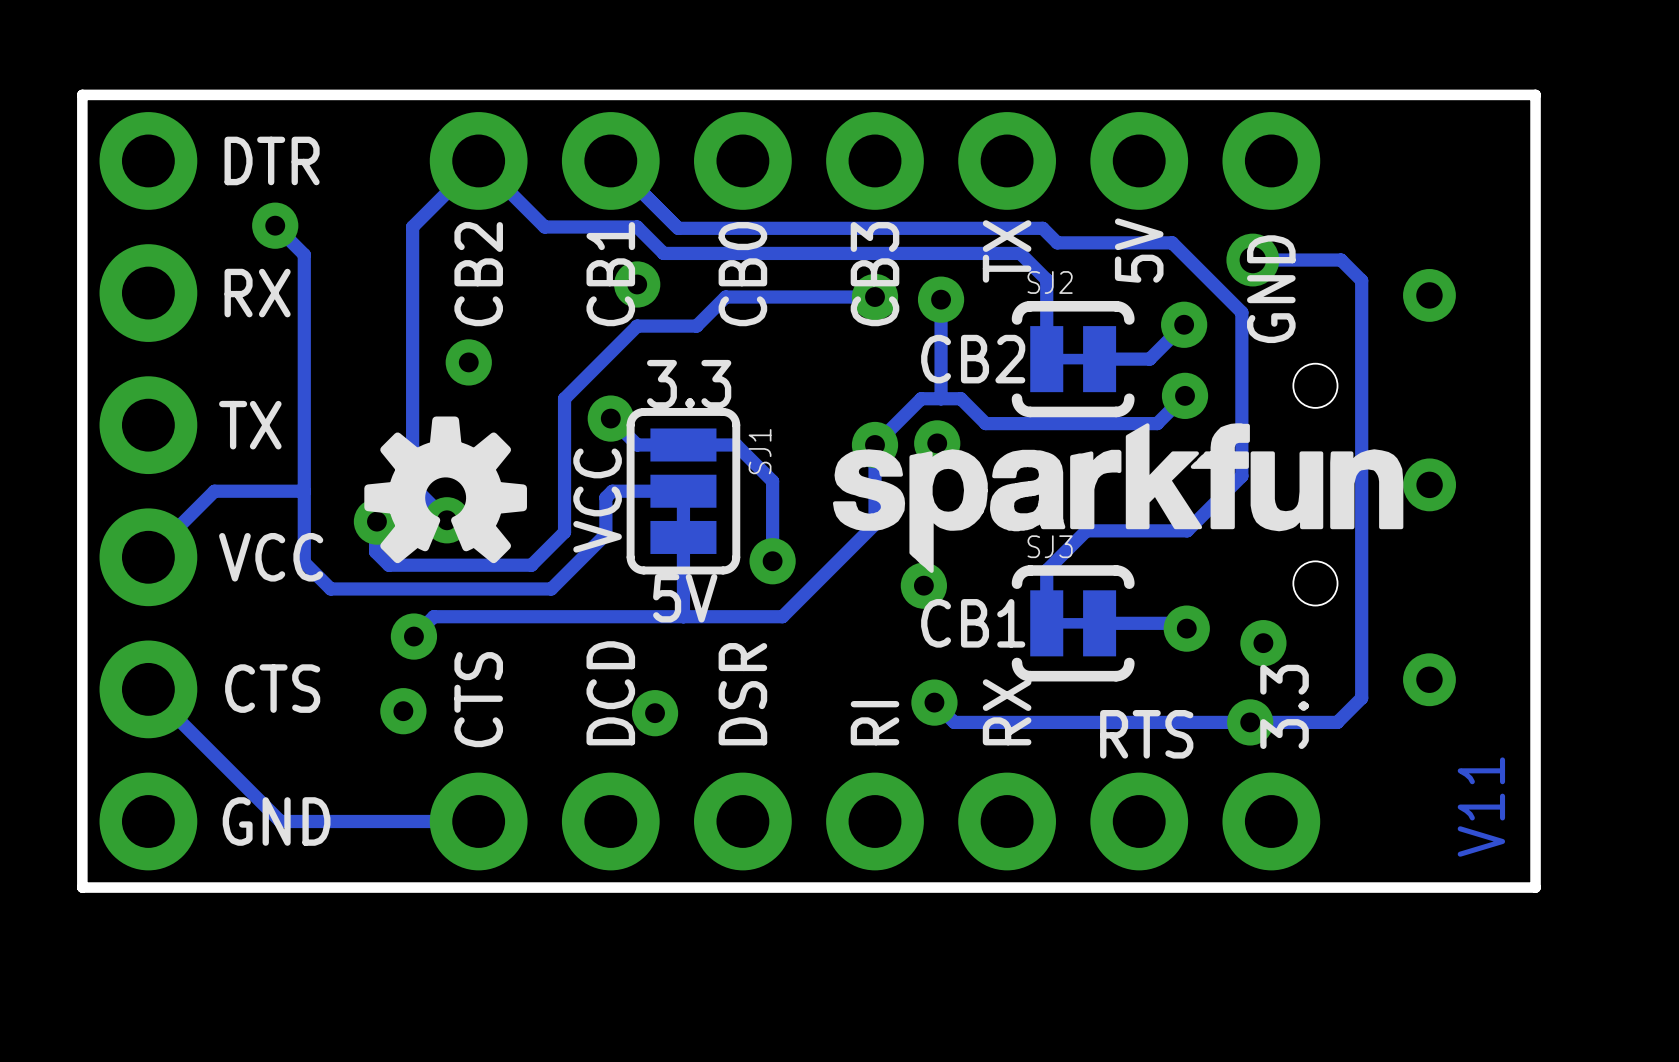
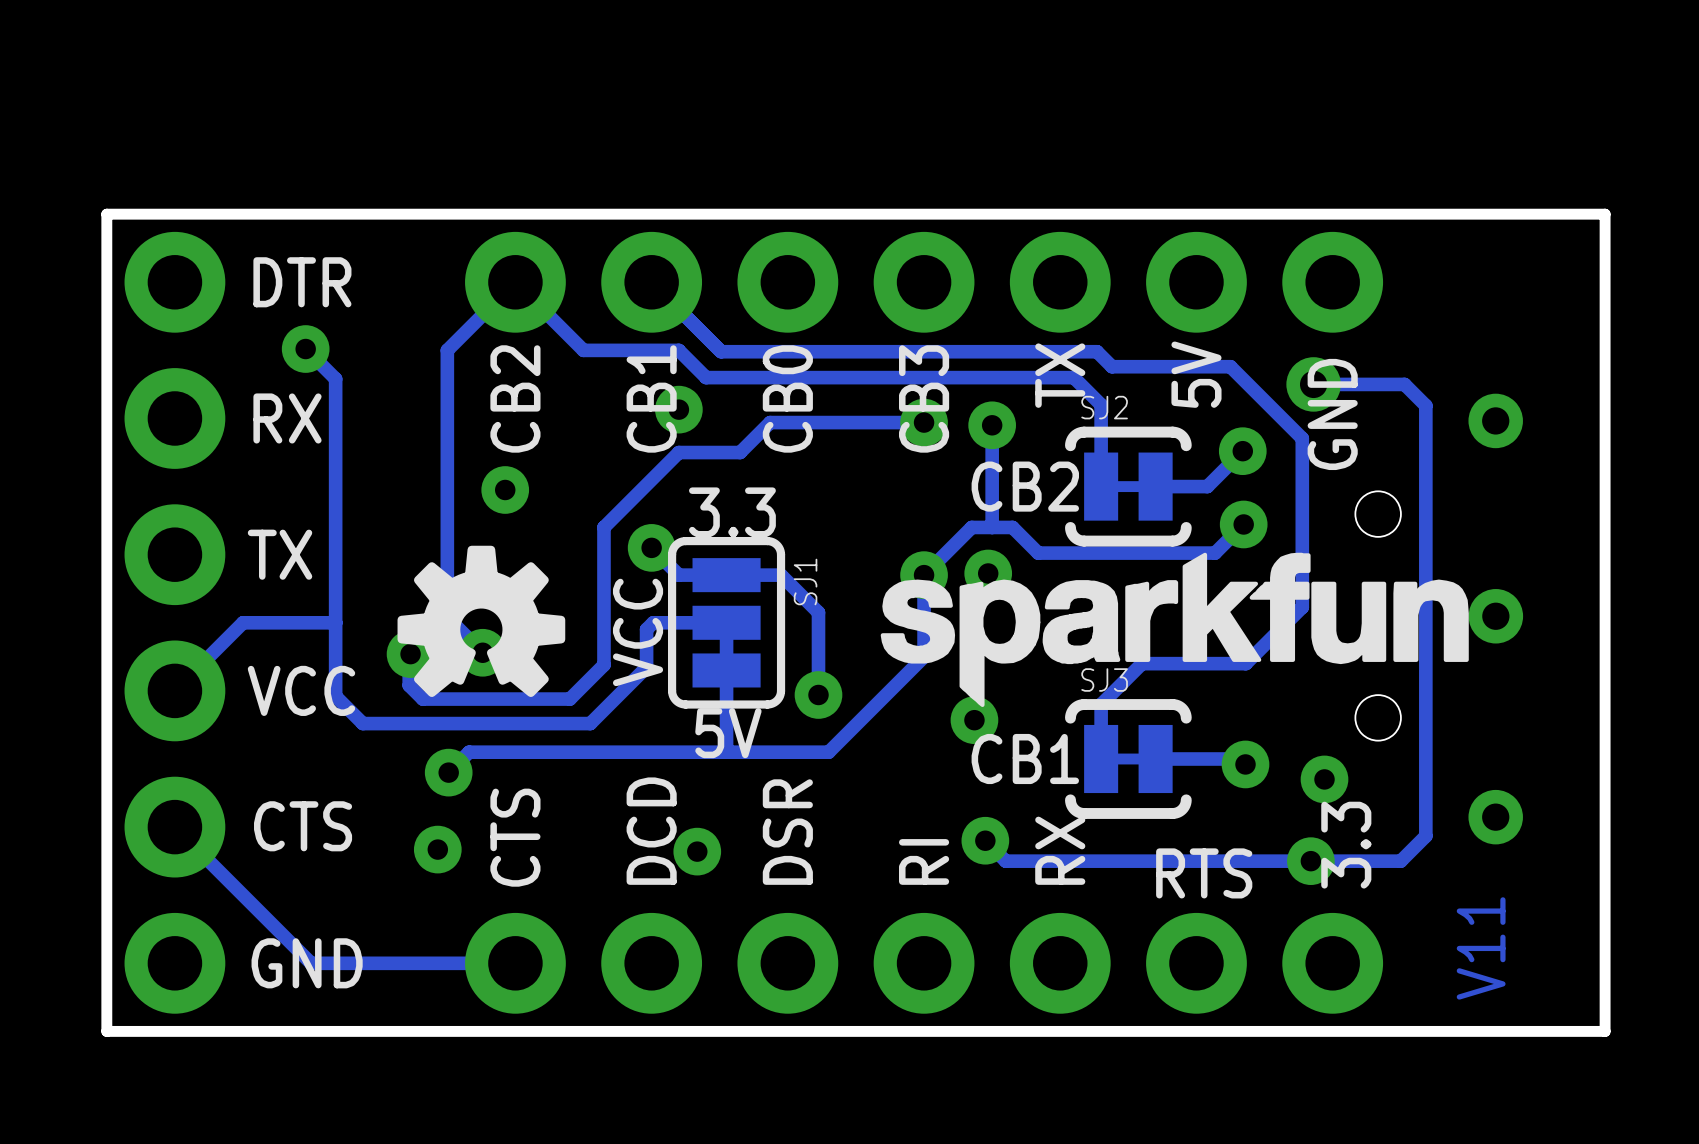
text position: V11 (1481, 807) -> V11 (1481, 948)

